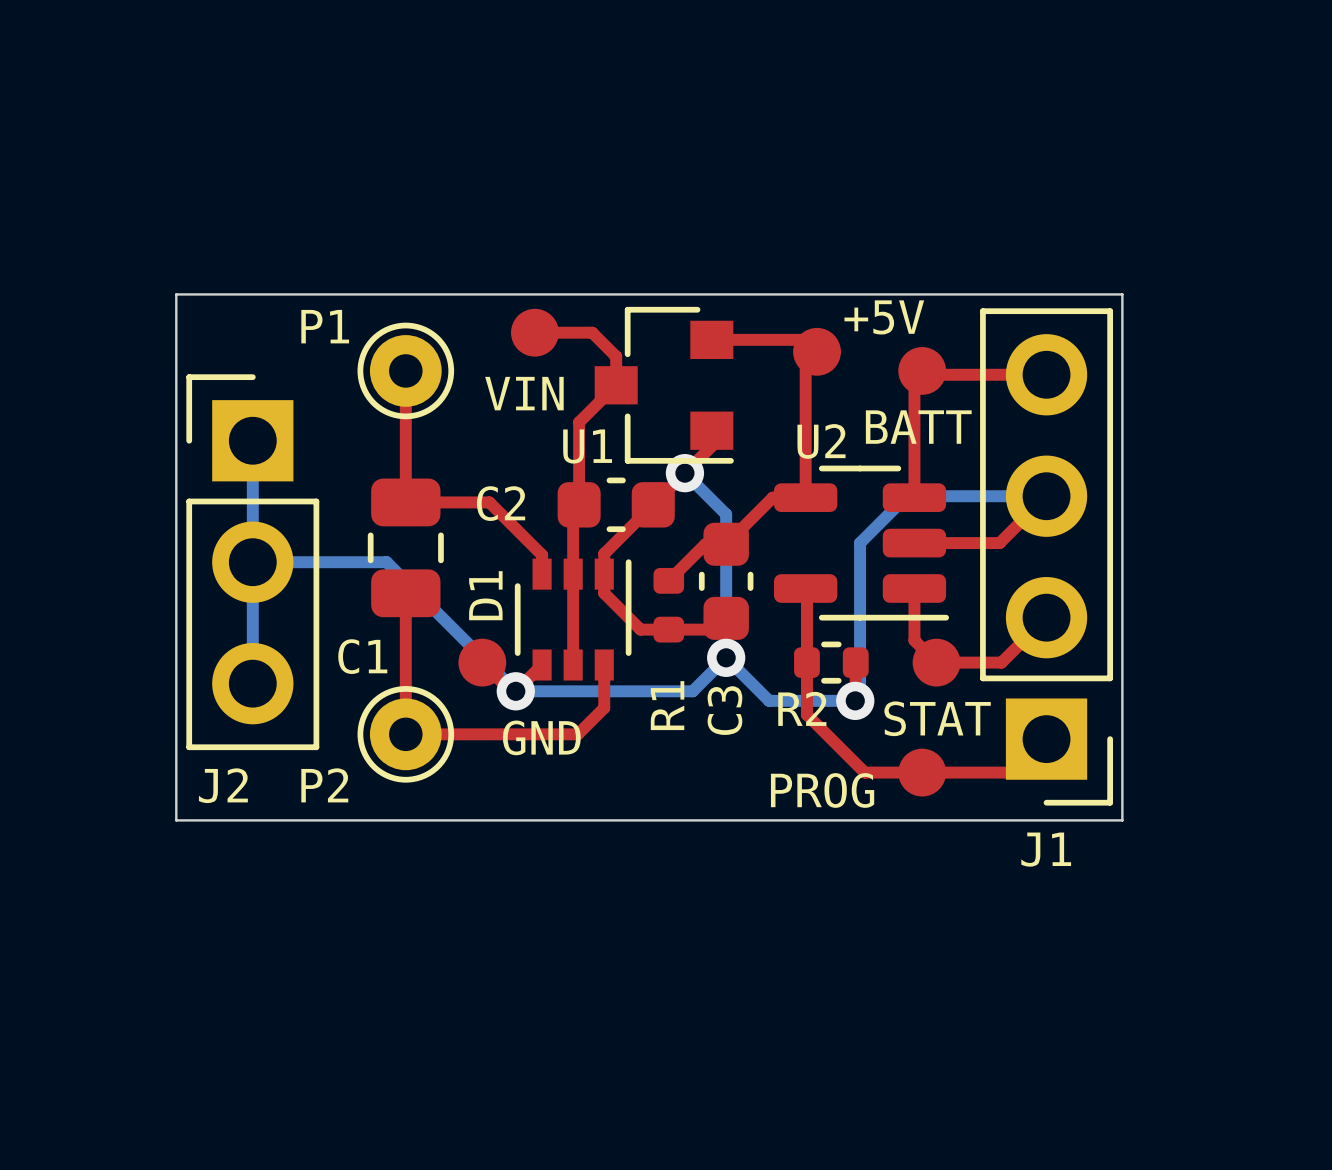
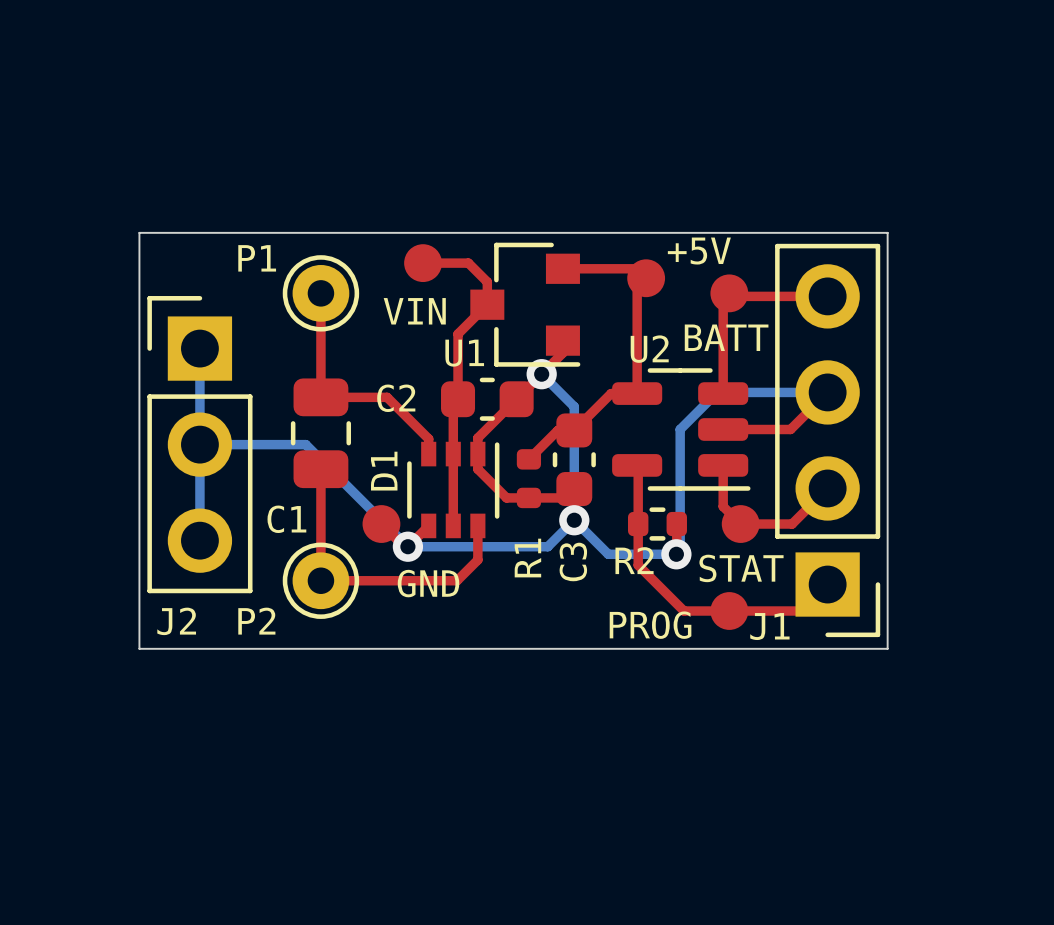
J1 name position: J1 (1046, 849) -> J1 (769, 626)

